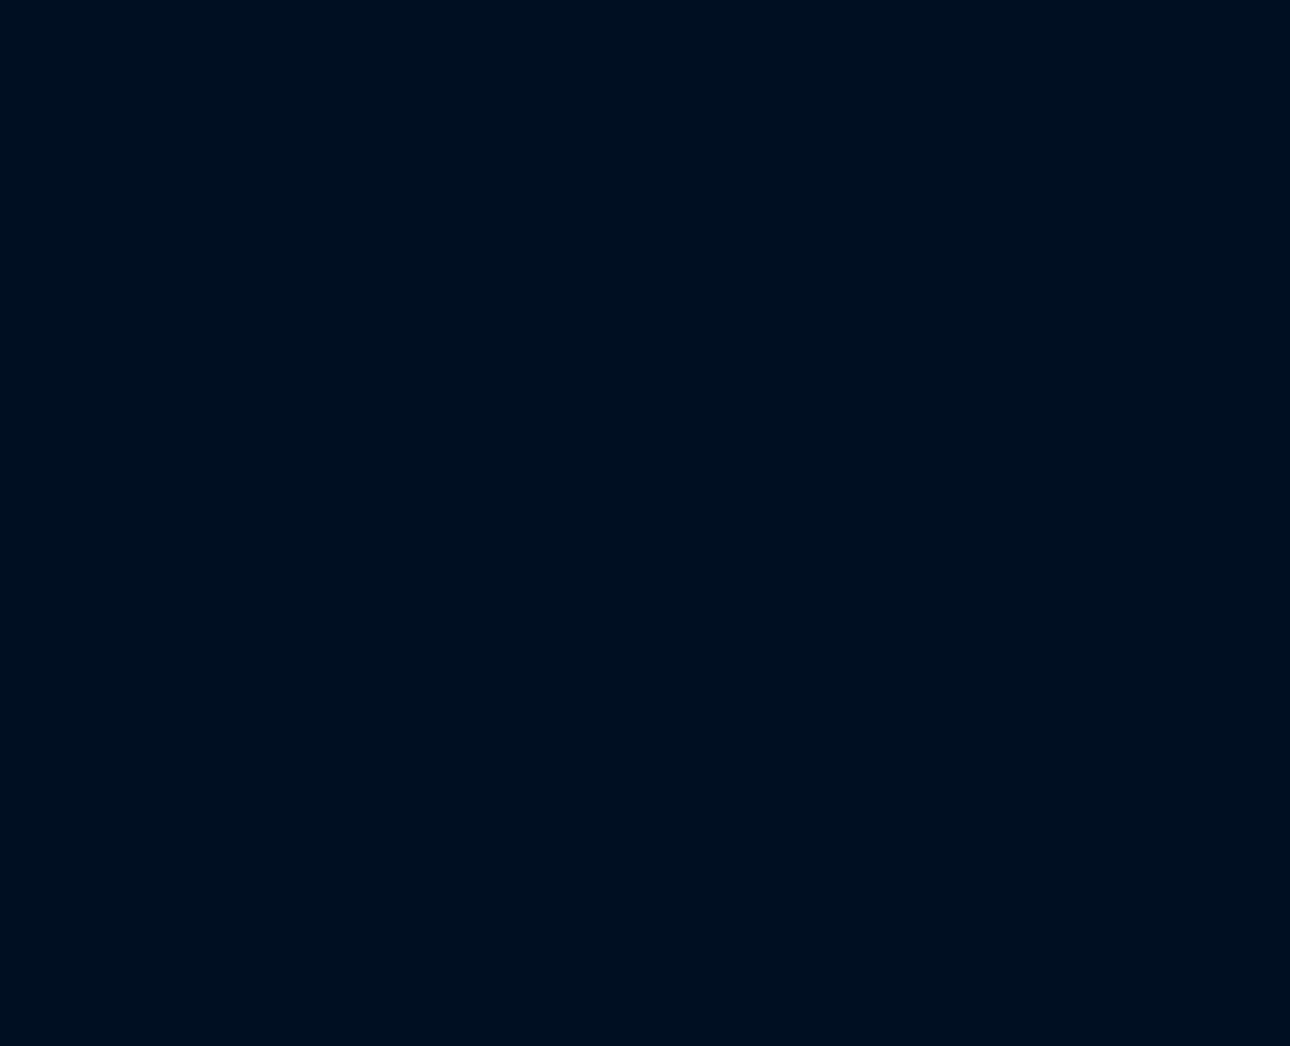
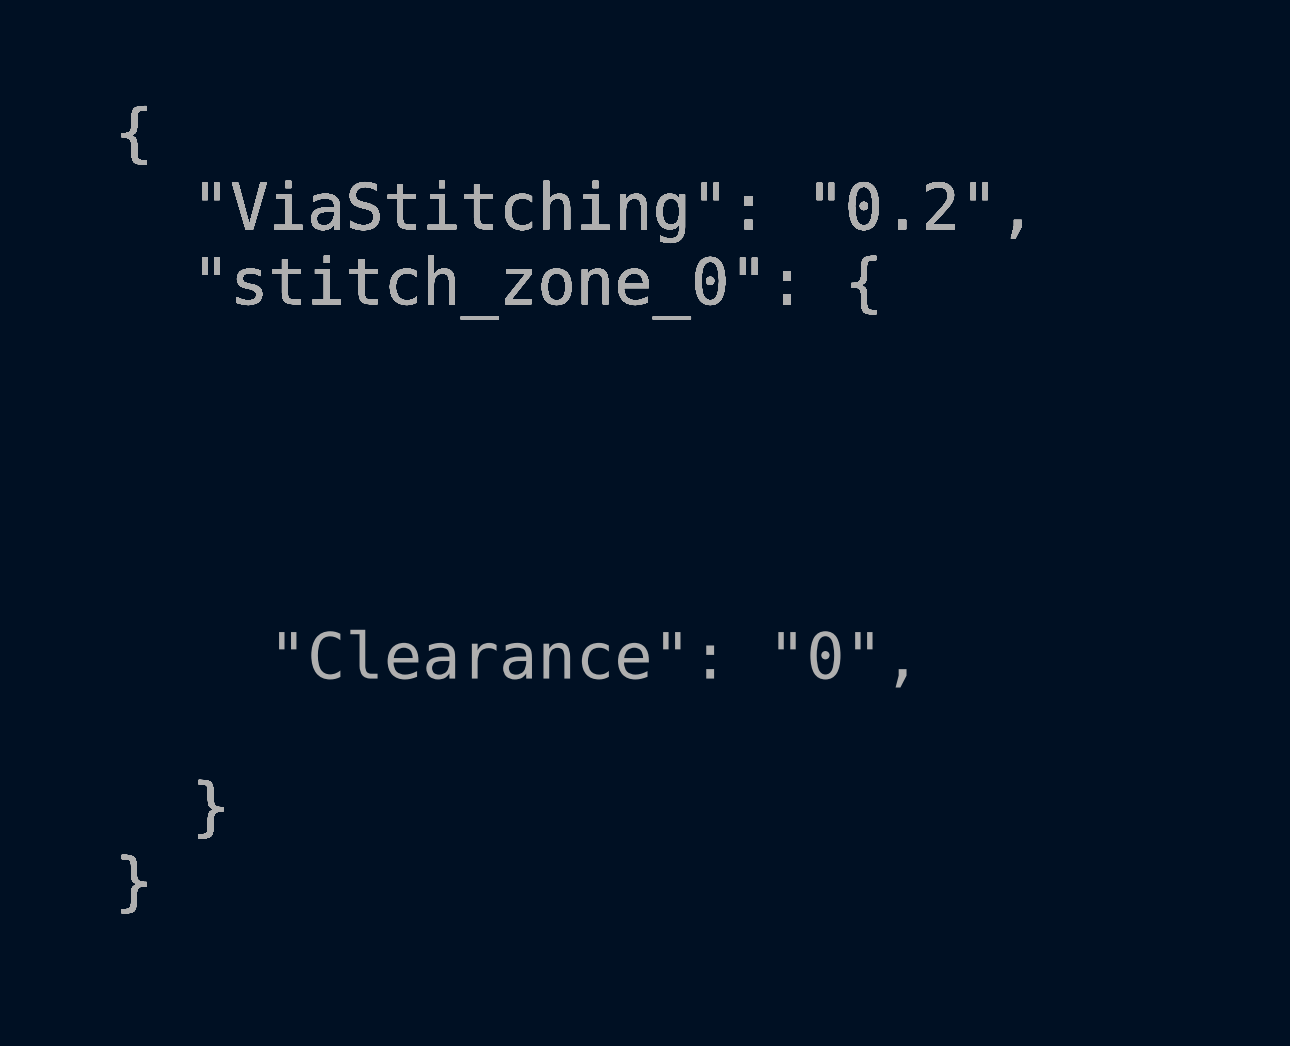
text: none -> { (134, 135)
text: none -> "ViaStitching": "0.2", (612, 211)
text: none -> "stitch_zone_0": { (539, 287)
text: none -> "Clearance": "0", (592, 658)
text: none -> } (210, 809)
text: none -> } (134, 884)

